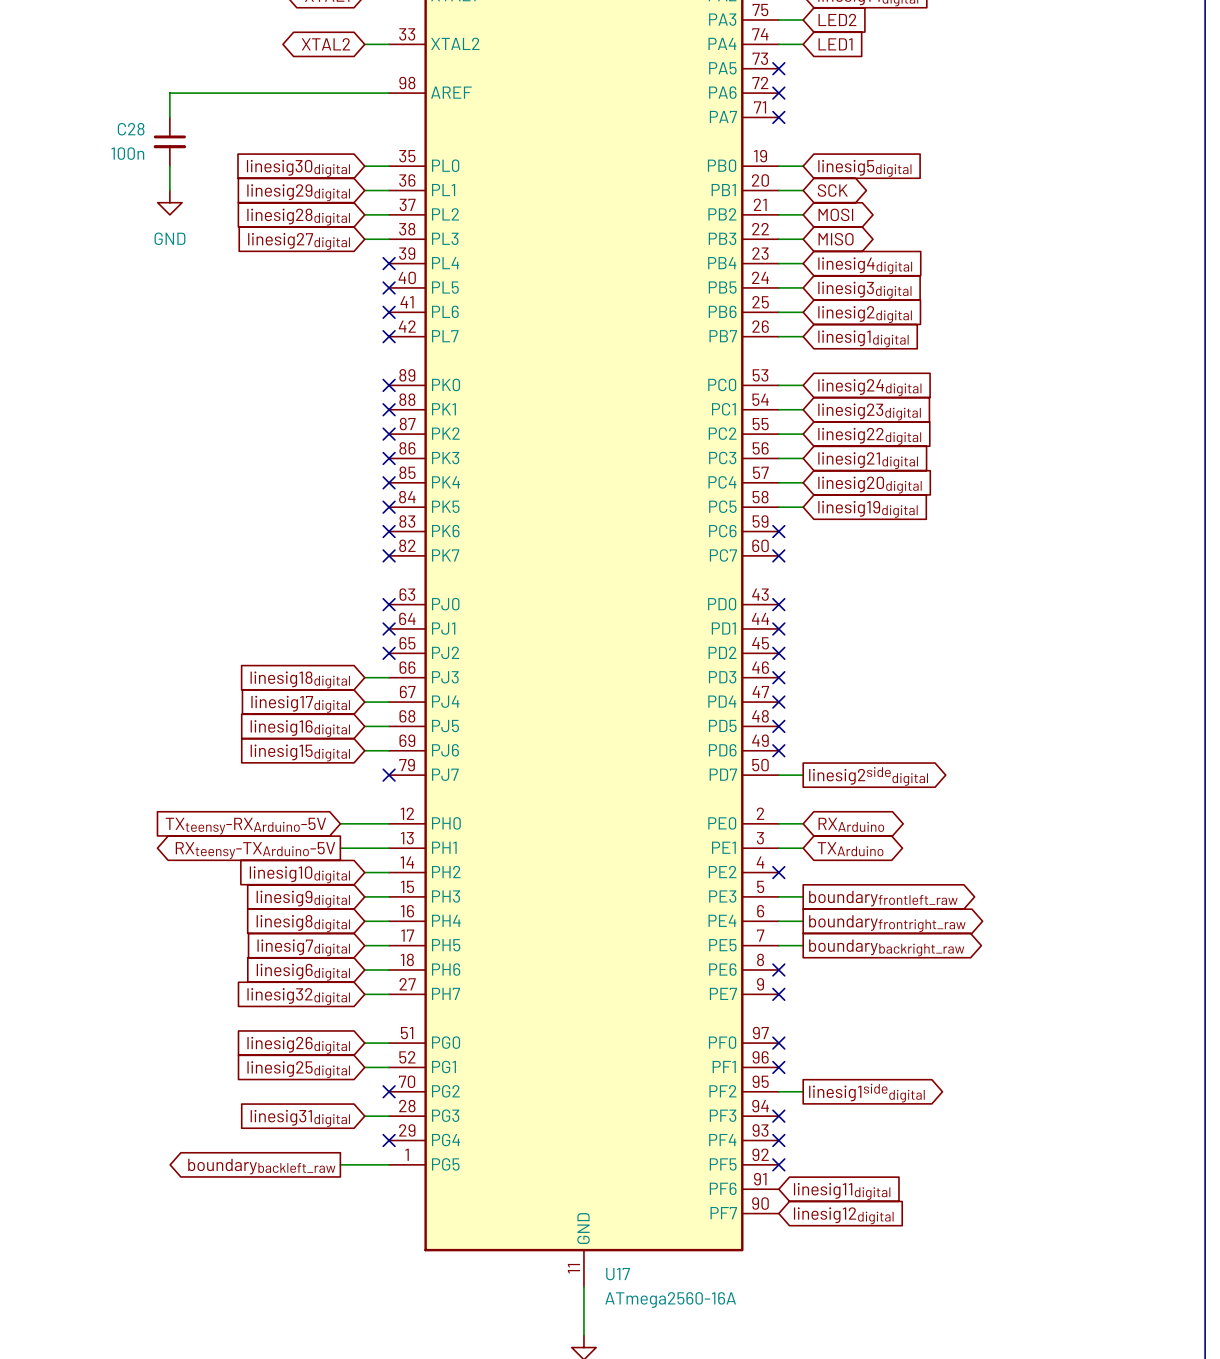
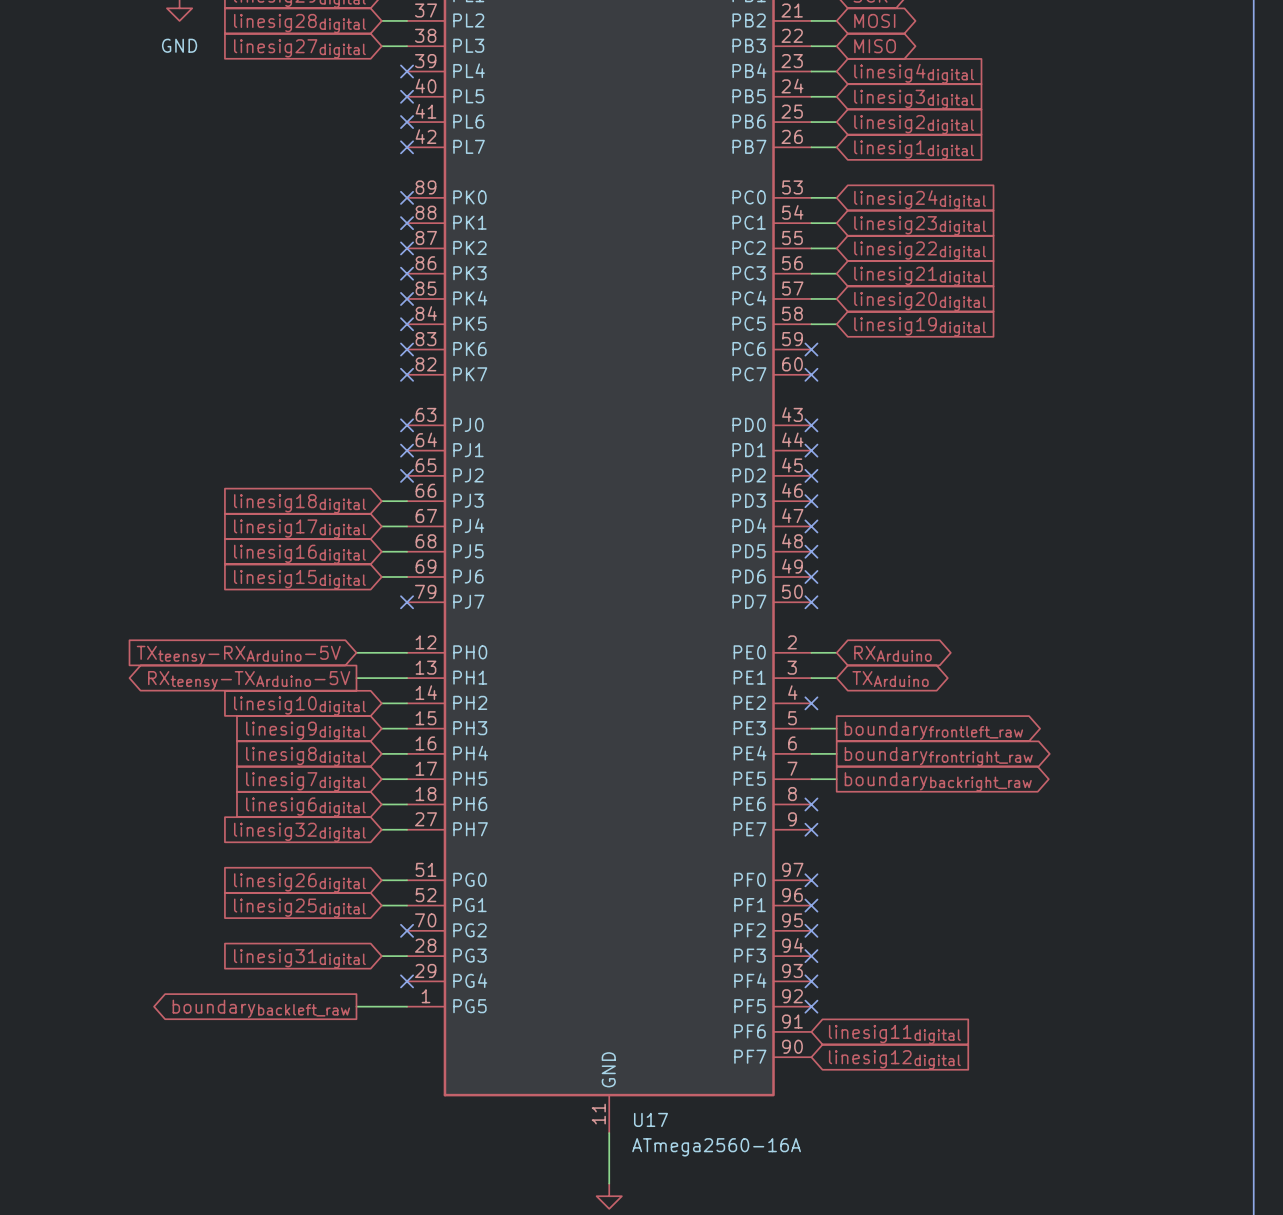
wire: (778, 775) (803, 775) -> none
no-connect mark: none -> (811, 602)
global label: linesig2sidedigital (868, 776) -> none
wire: (778, 1091) (803, 1091) -> none
no-connect mark: none -> (811, 930)
global label: linesig1sidedigital (866, 1093) -> none

